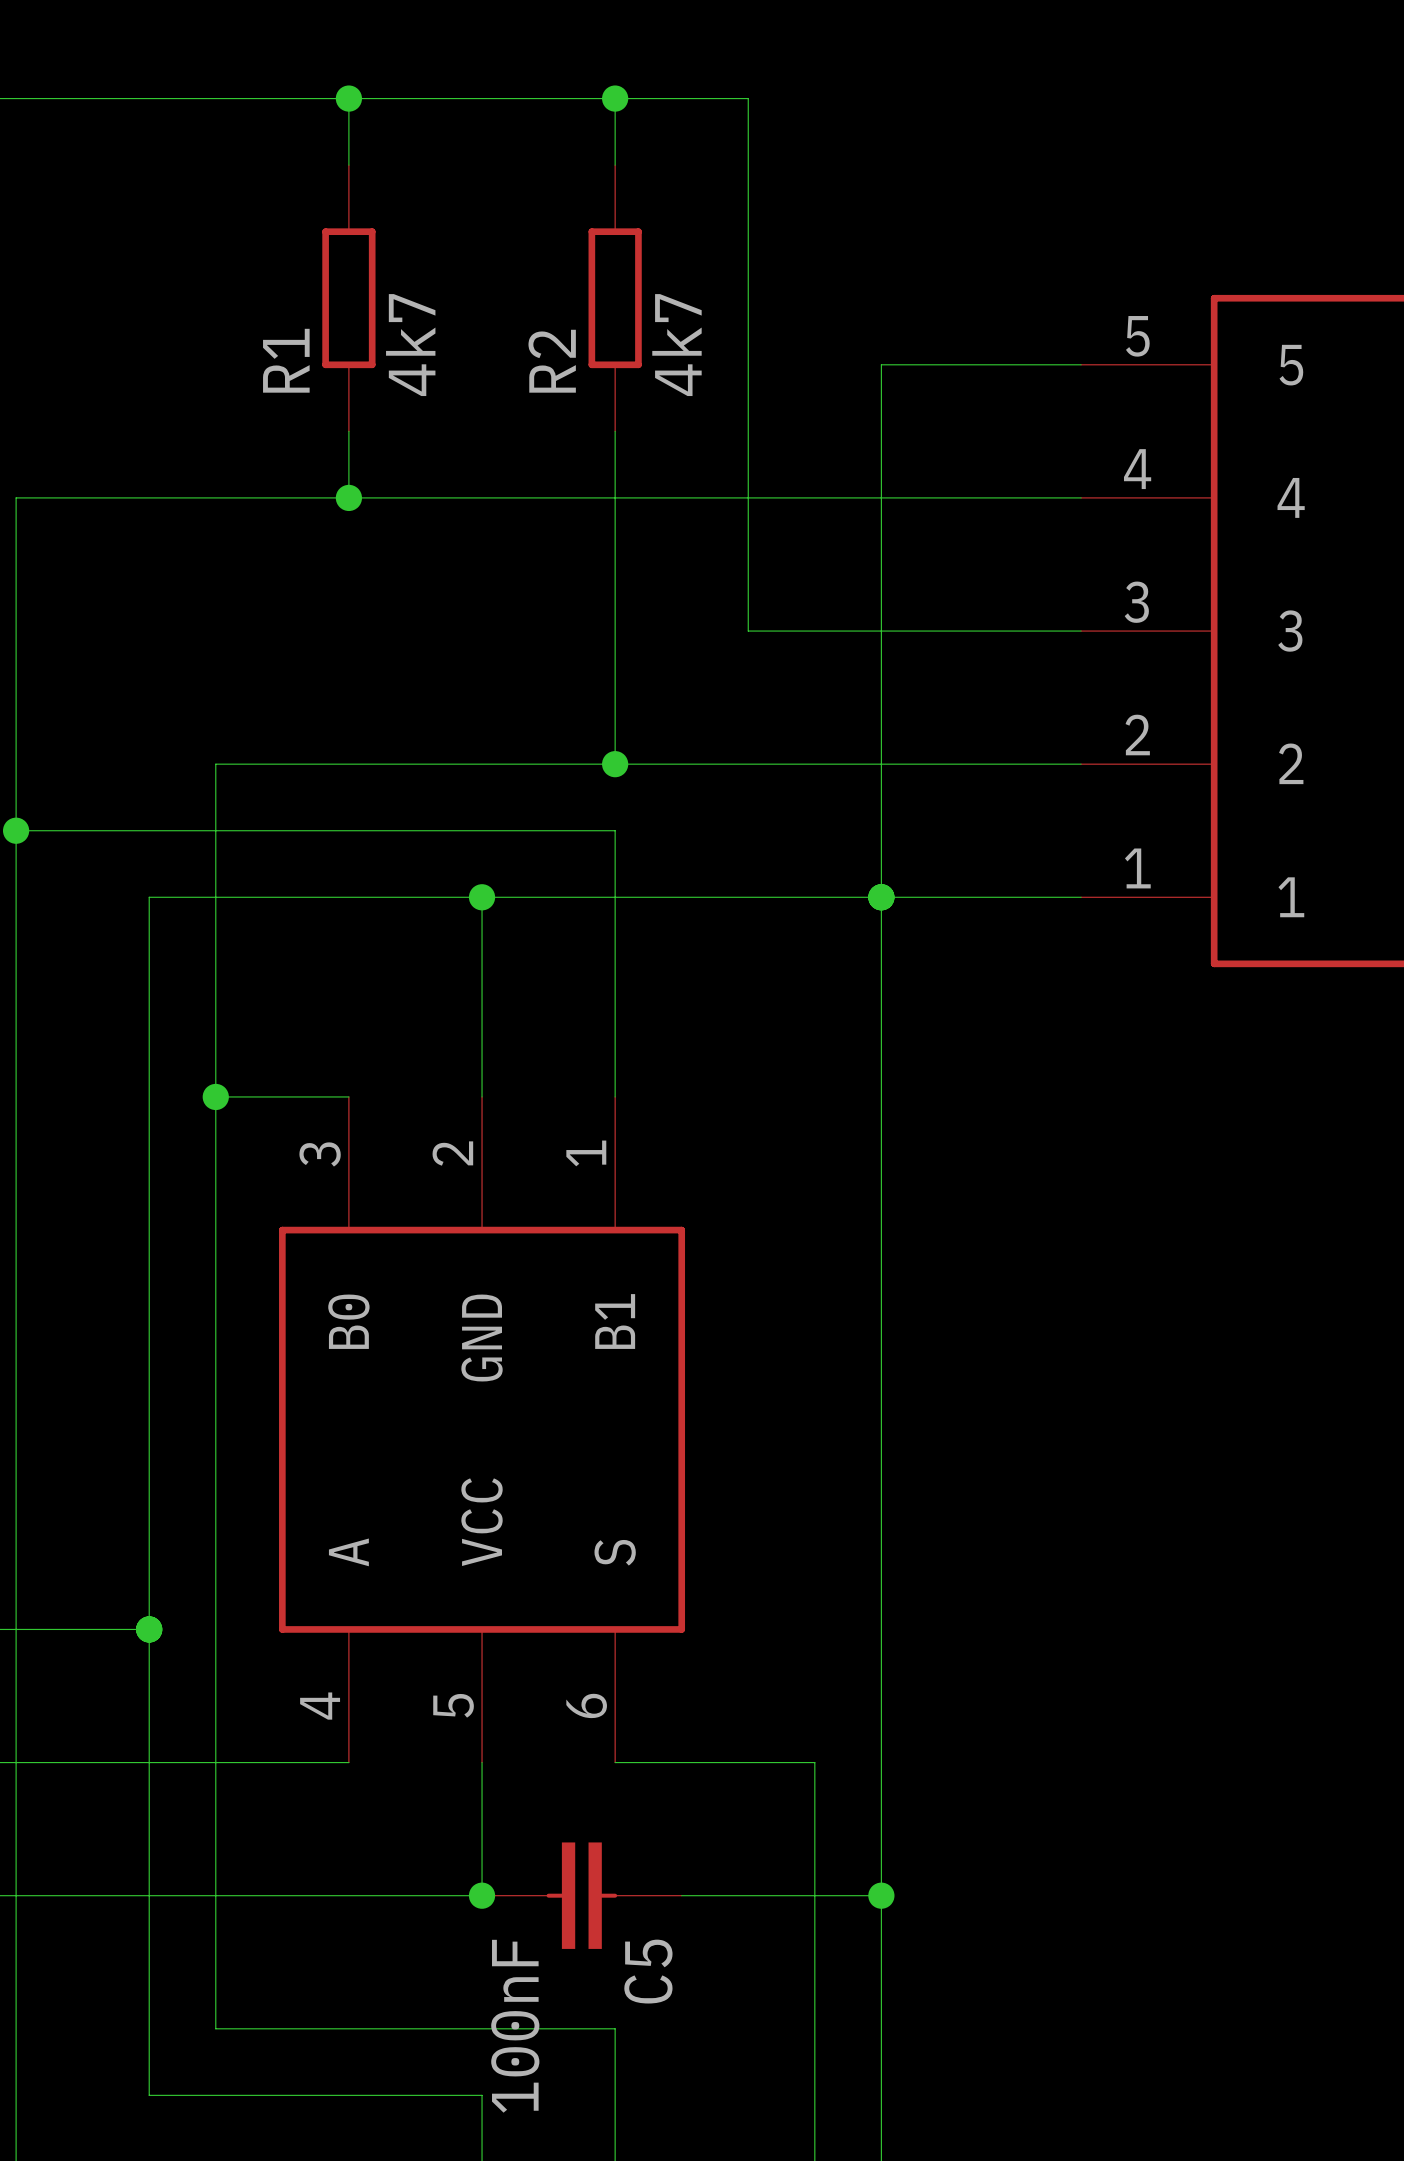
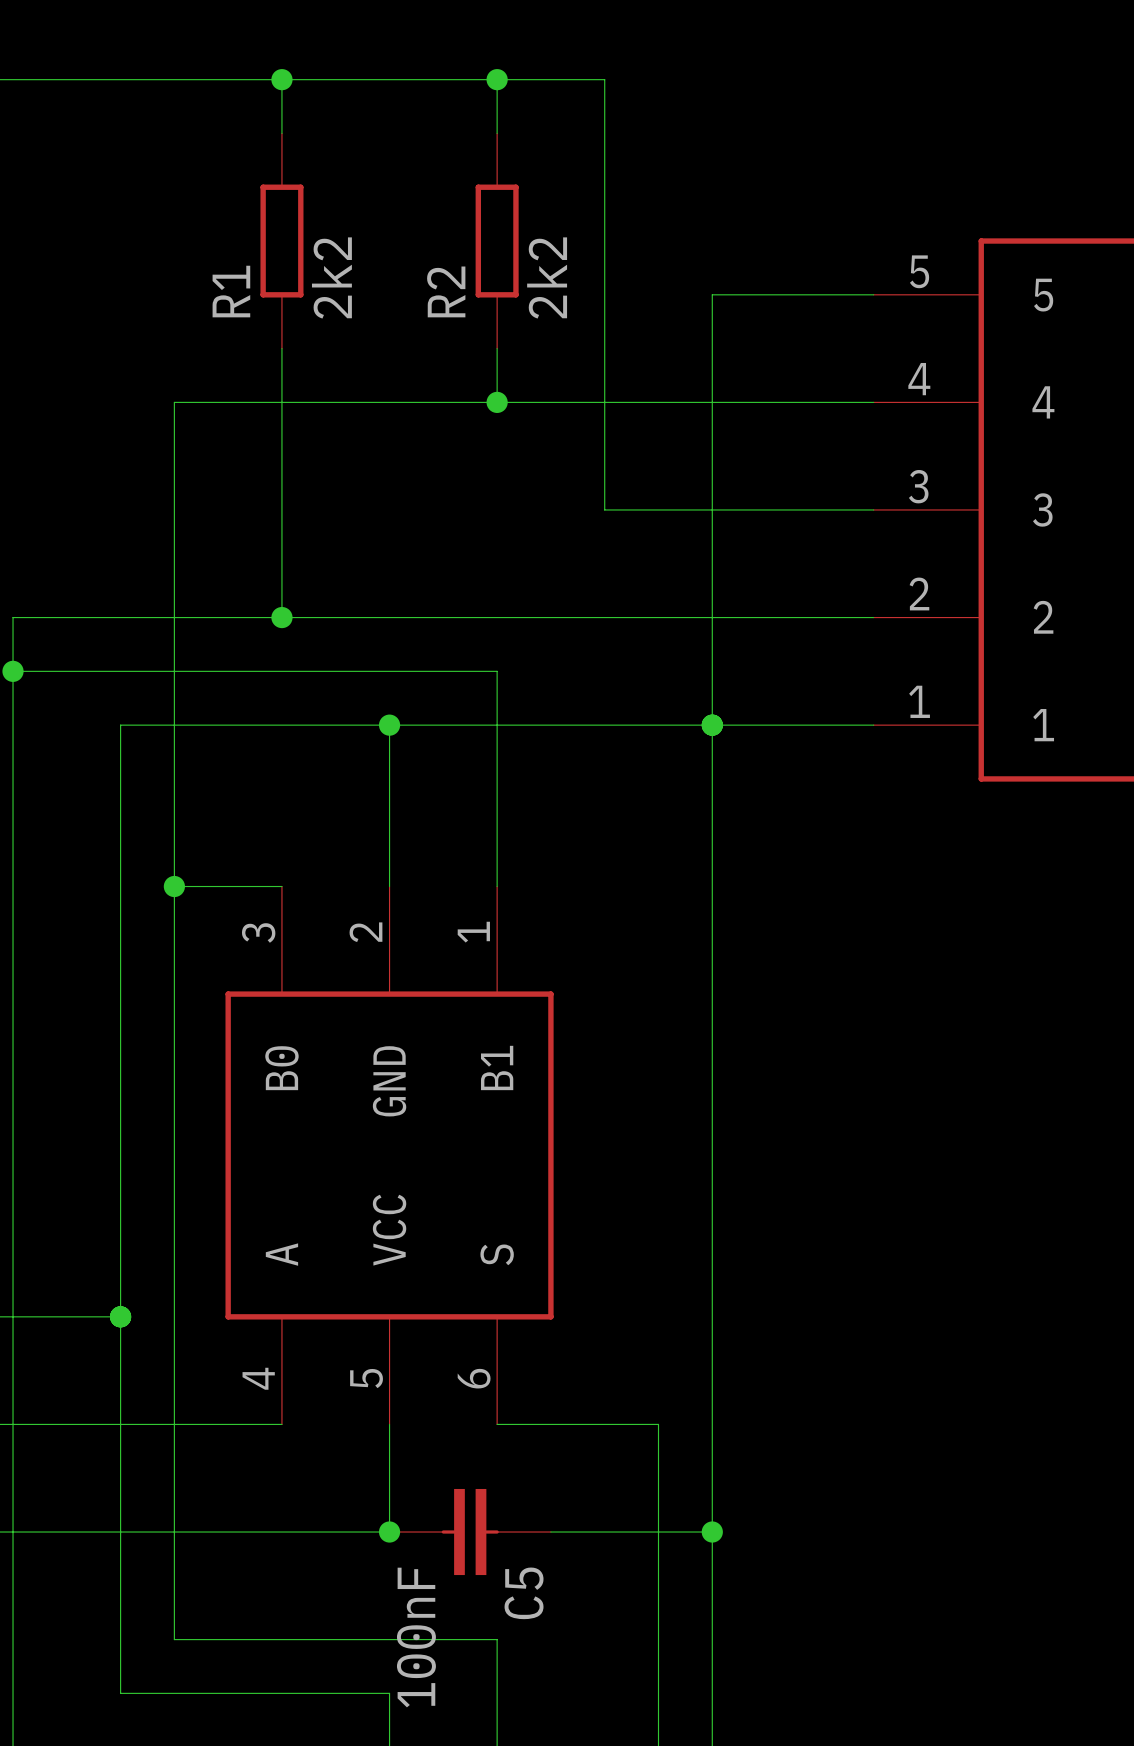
R1 value: 4k7 (410, 345) -> 2k2 (331, 277)
R2 value: 4k7 (676, 345) -> 2k2 (547, 277)
wire: (215, 497) (16, 497) (16, 764) -> (174, 402) (174, 617) (13, 617)
junction: (348, 497) -> none
wire: (615, 497) (615, 764) -> (281, 402) (281, 617)
junction: none -> (497, 402)
junction: none -> (281, 617)
junction: (615, 764) -> none

